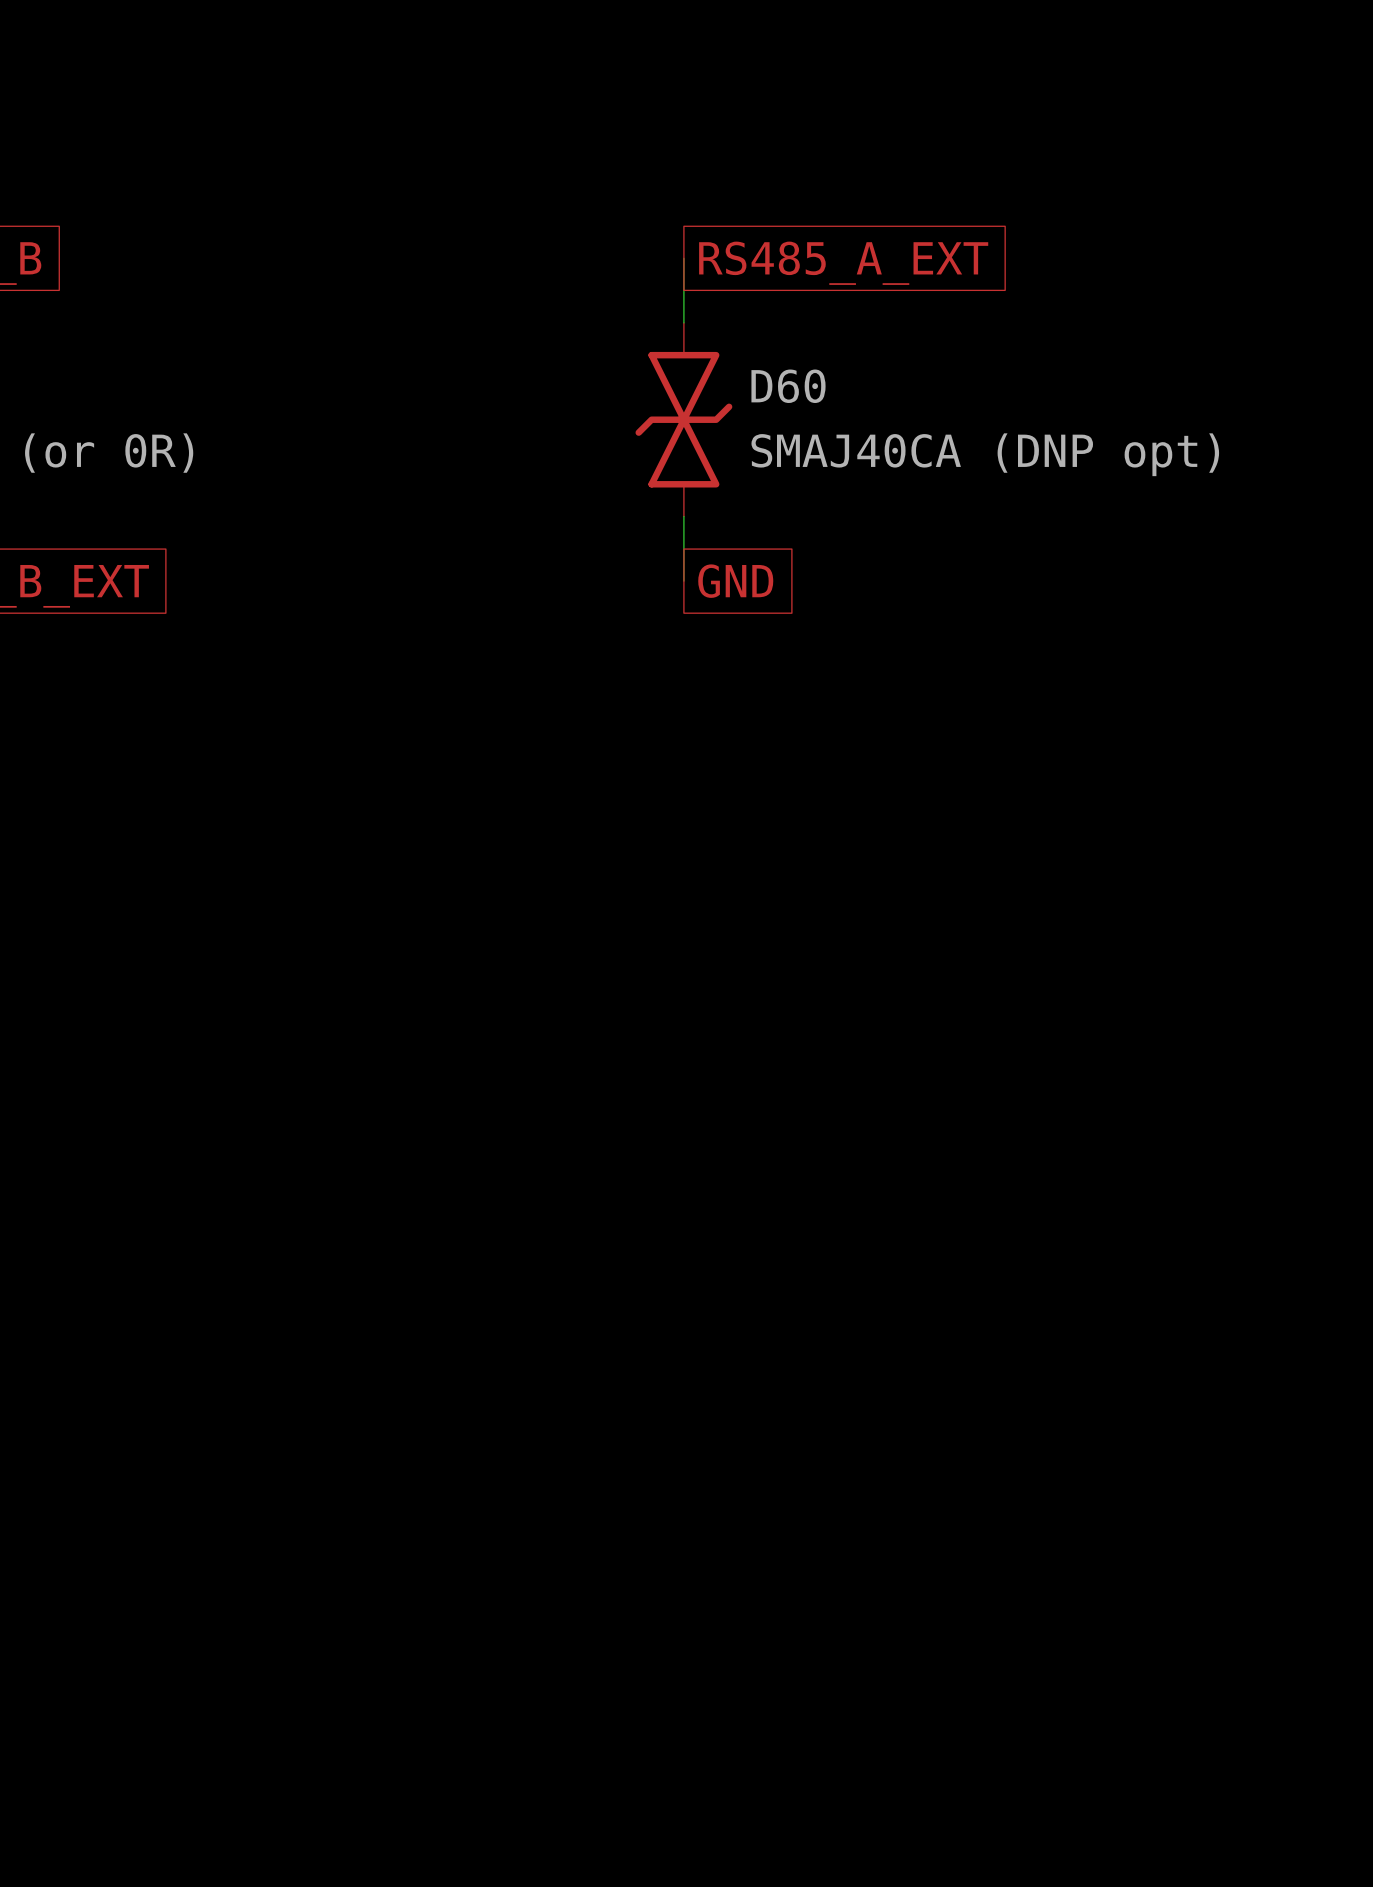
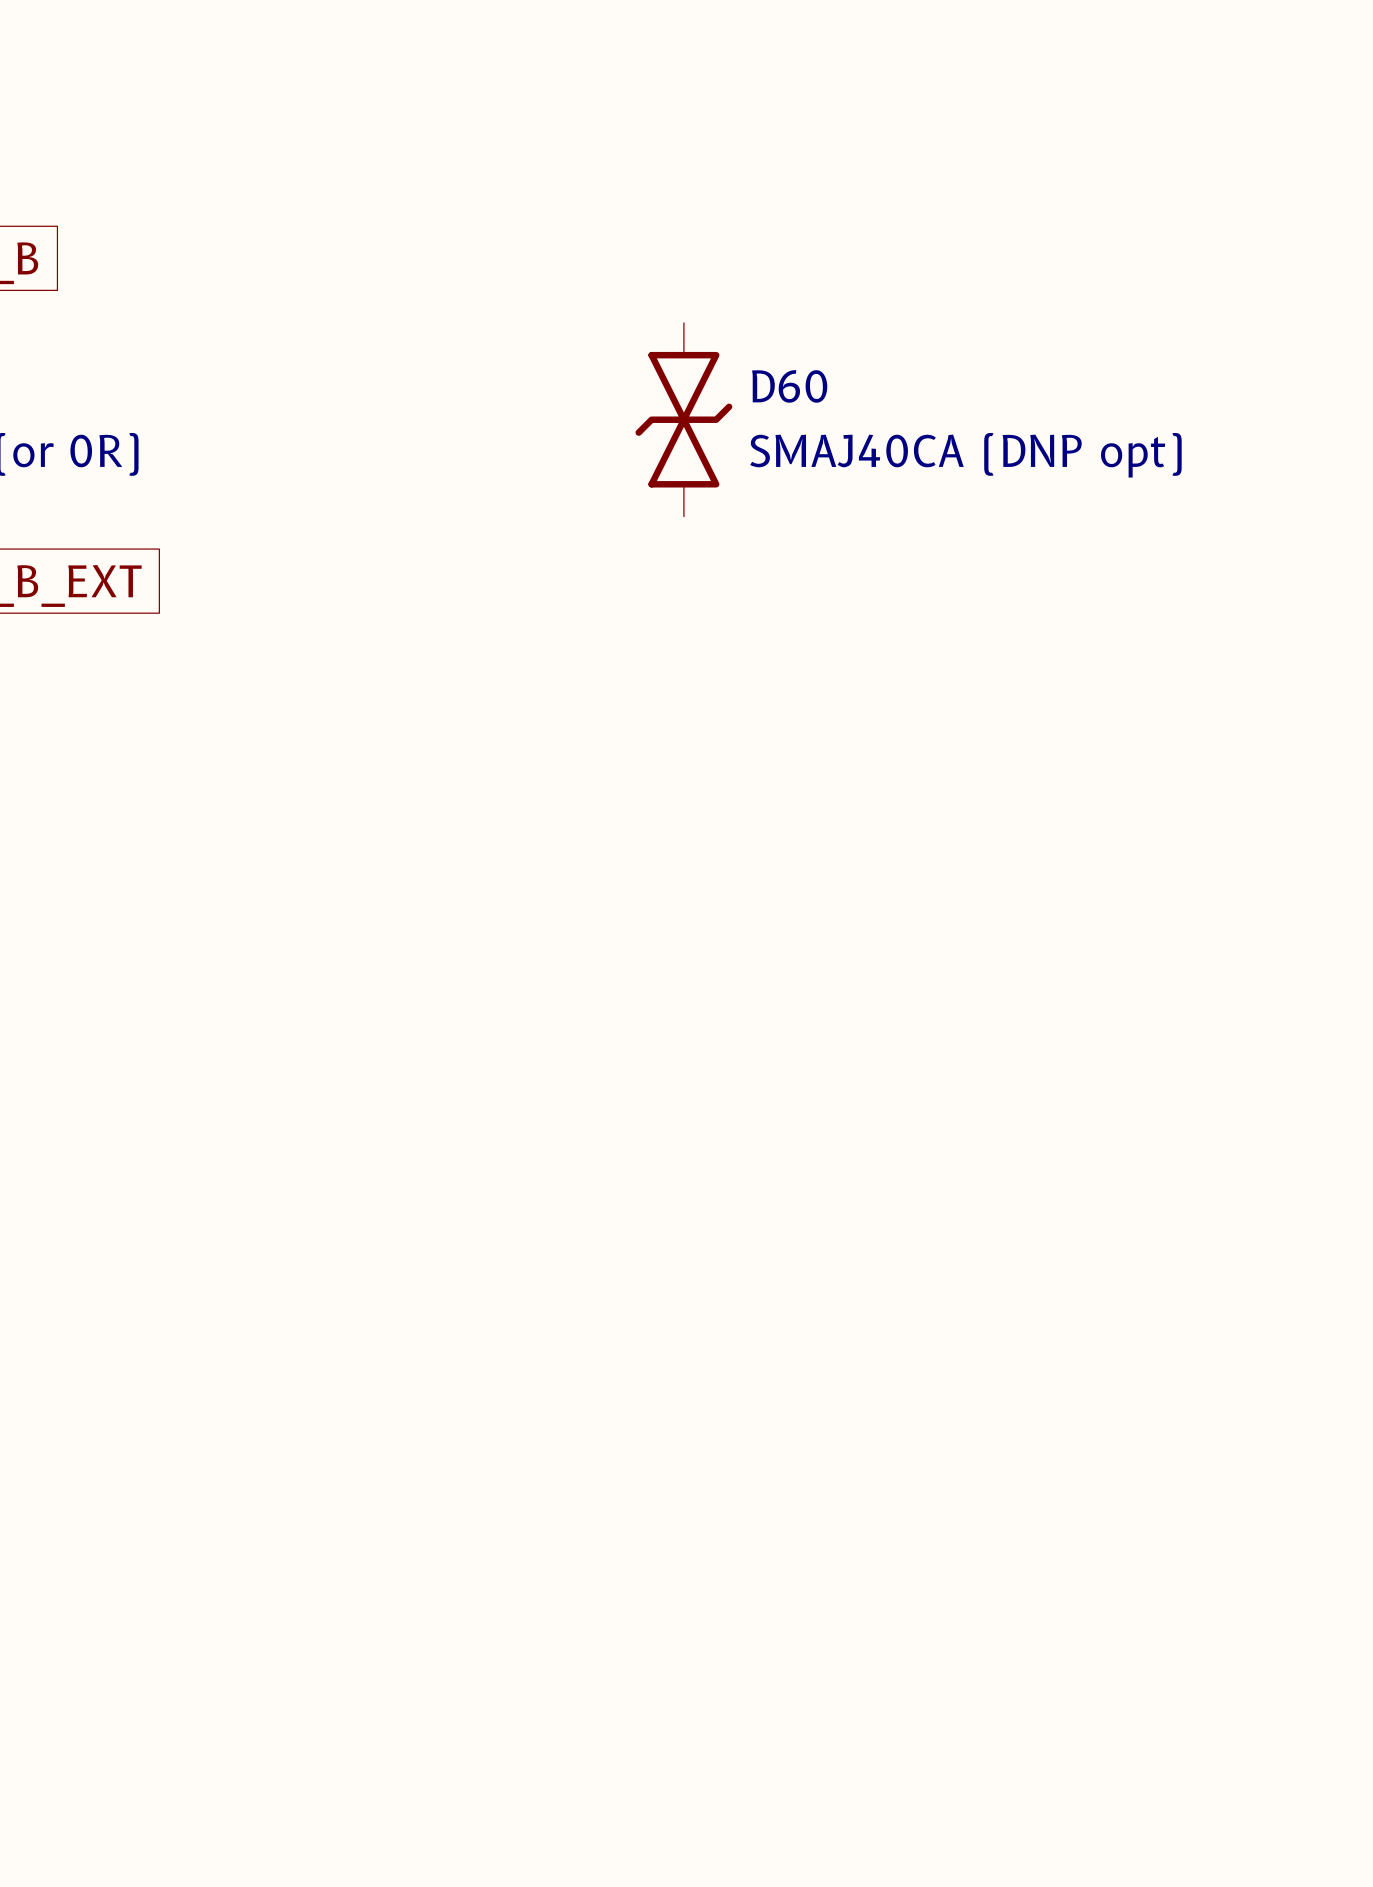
wire: (683, 258) (683, 322) -> none
global label: RS485_A_EXT (843, 263) -> none
wire: (683, 516) (683, 581) -> none
global label: GND (735, 581) -> none

